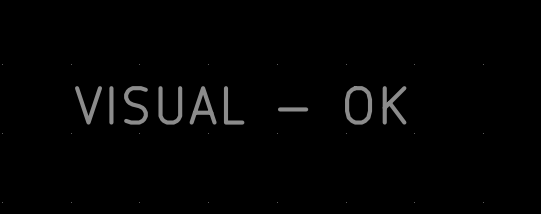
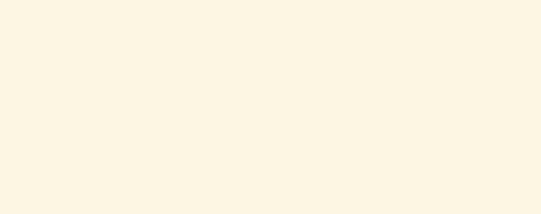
text: VISUAL - OK (240, 105) -> none

